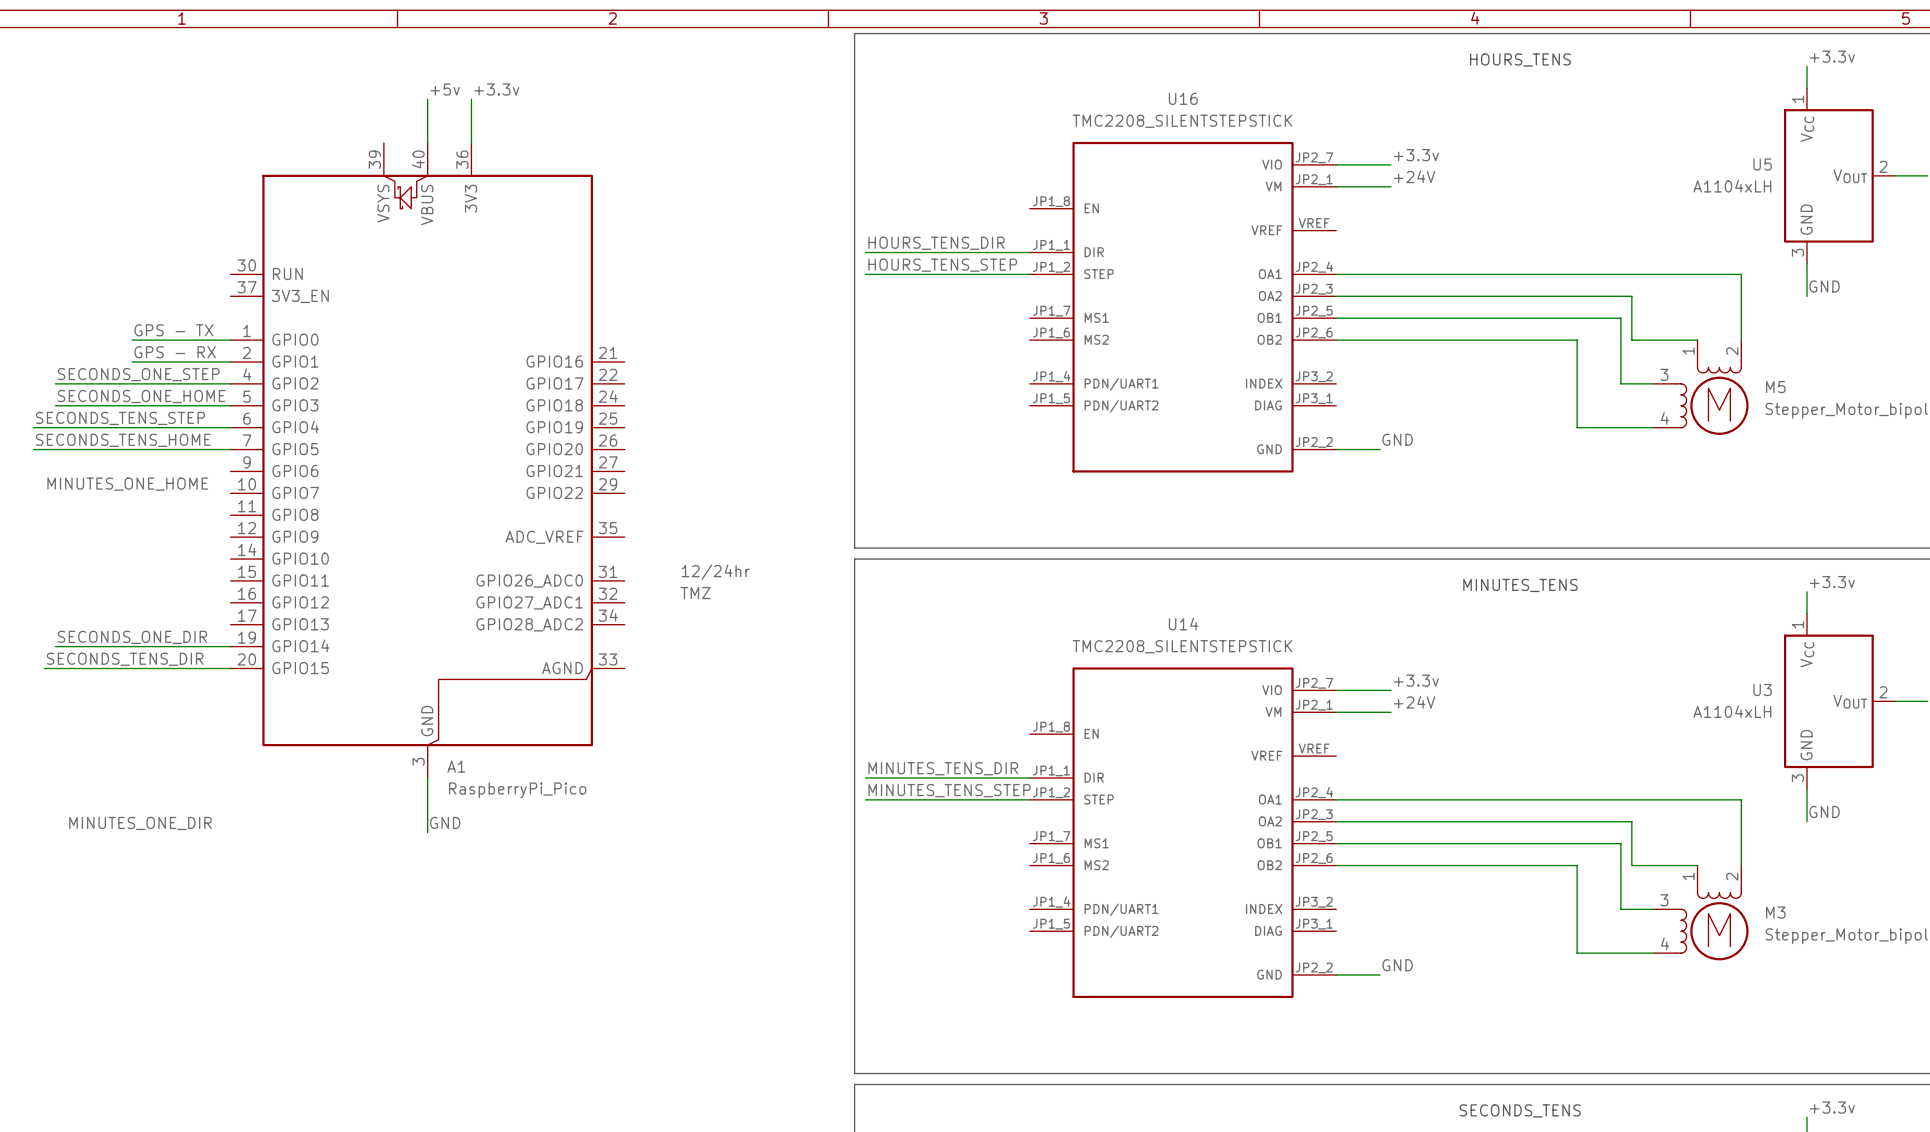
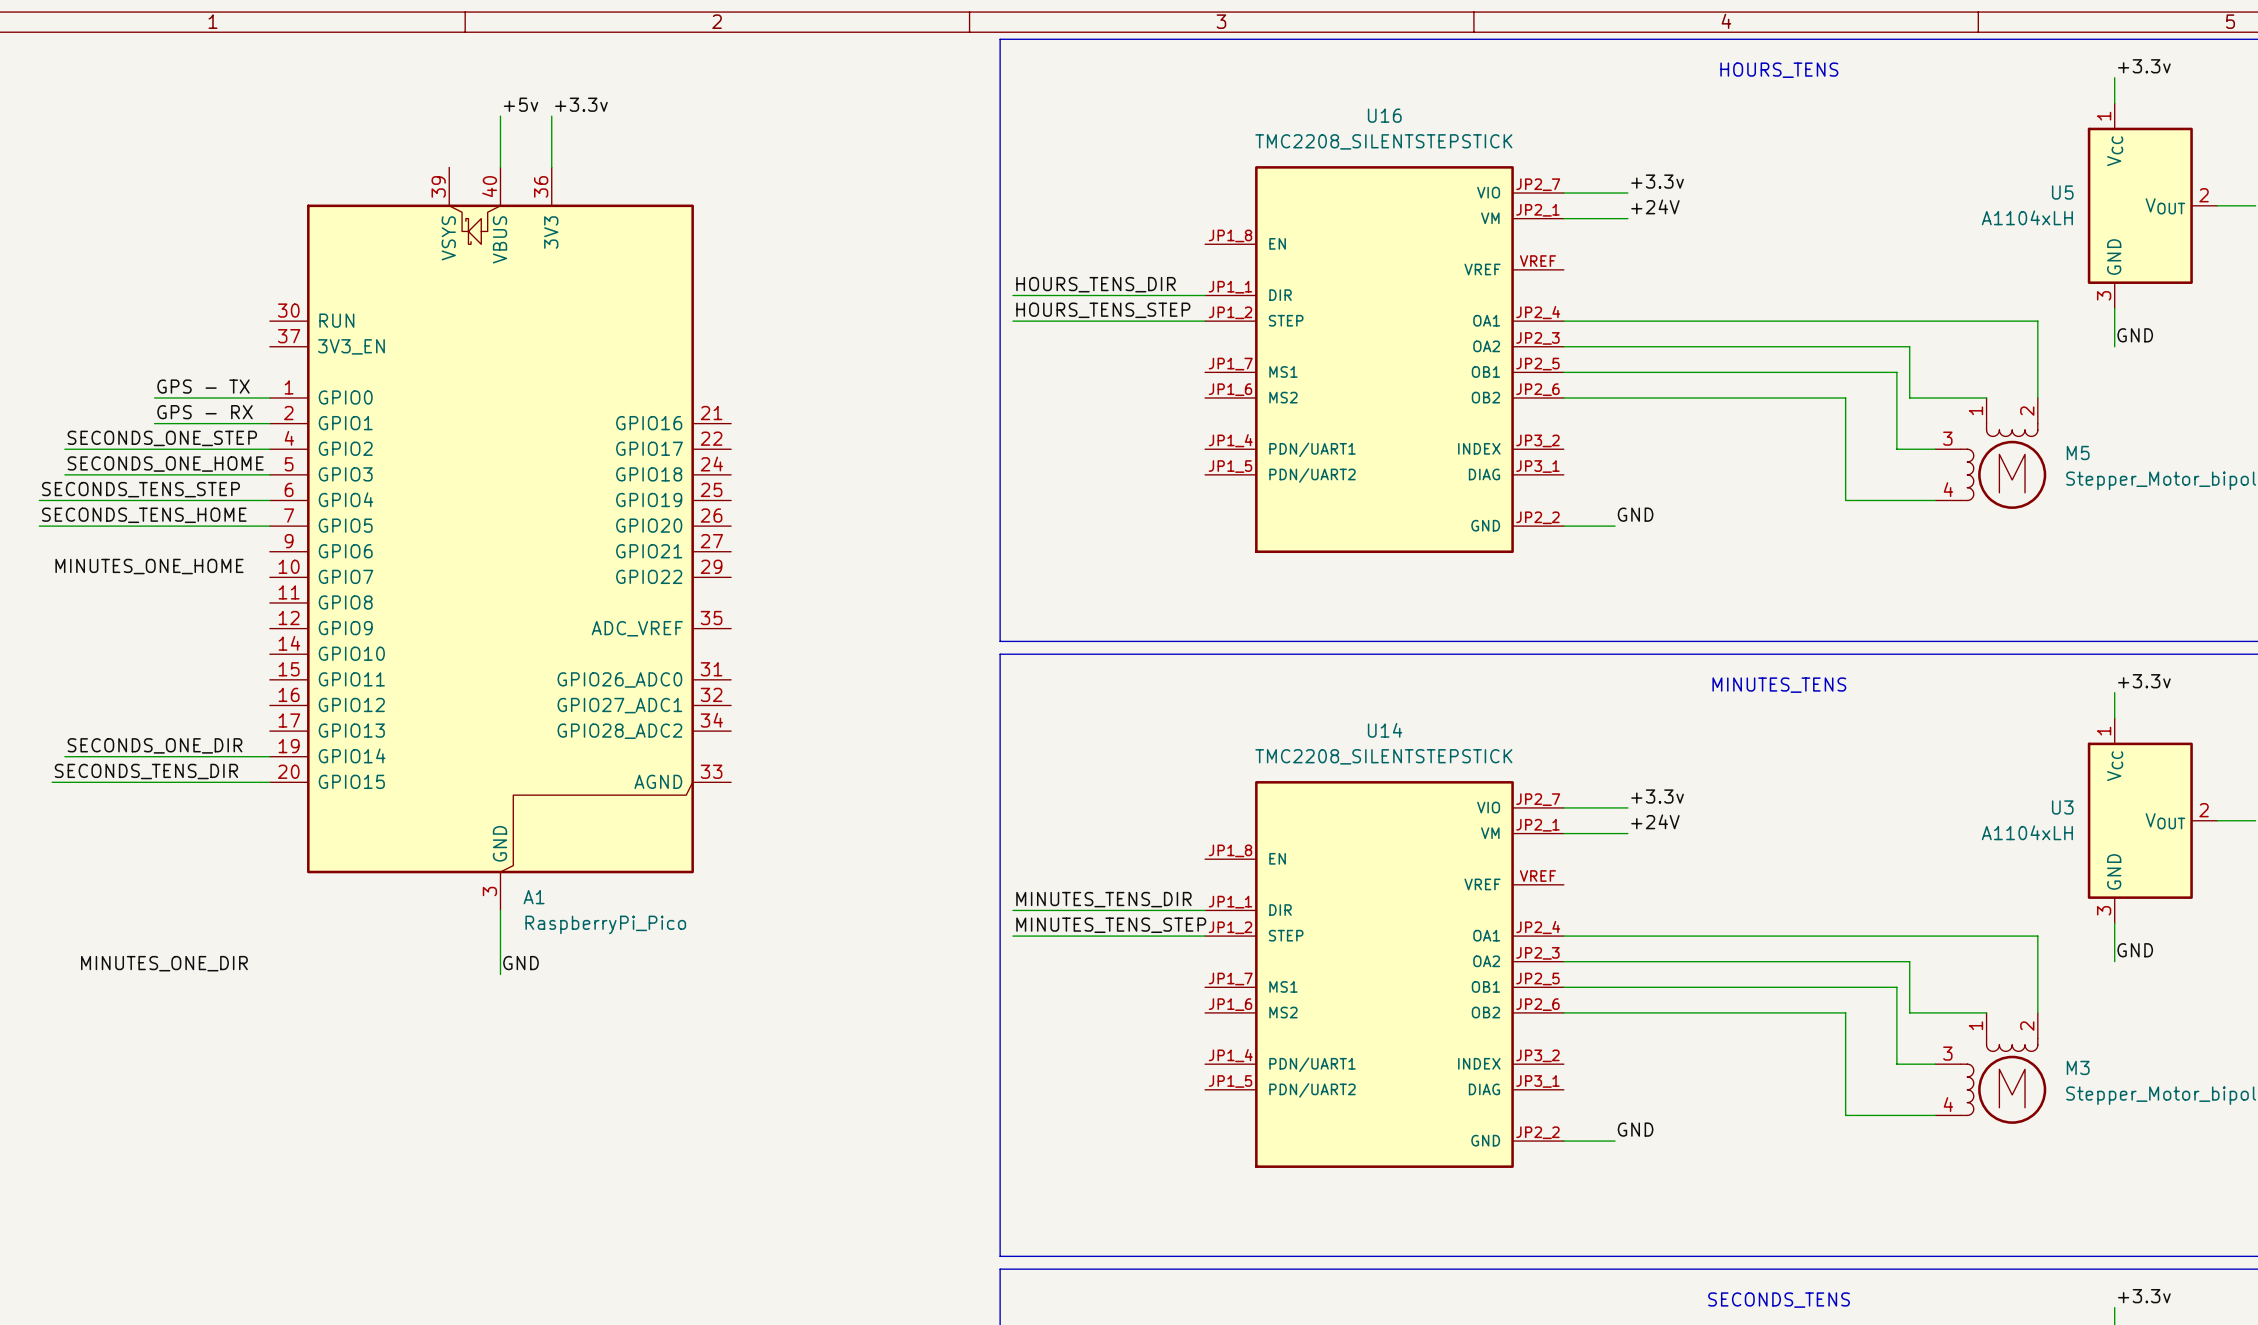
label: 12/24hr (715, 572) -> none
label: TMZ (695, 593) -> none

